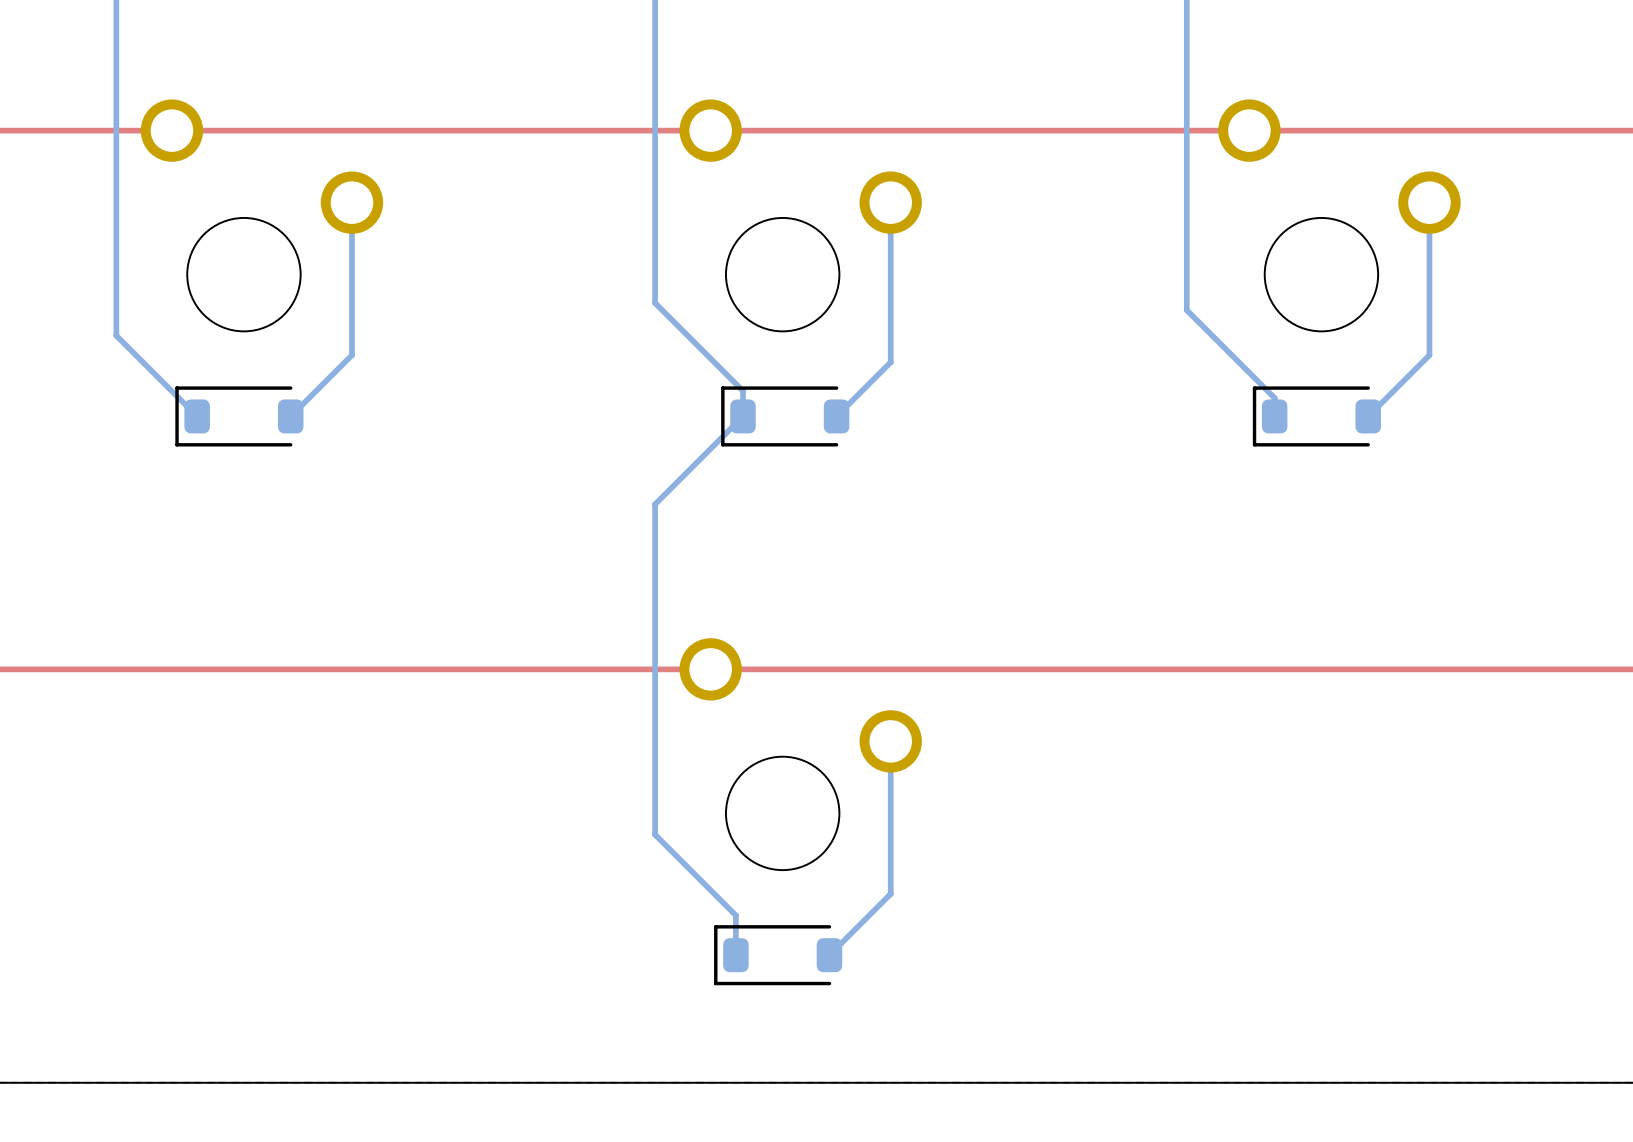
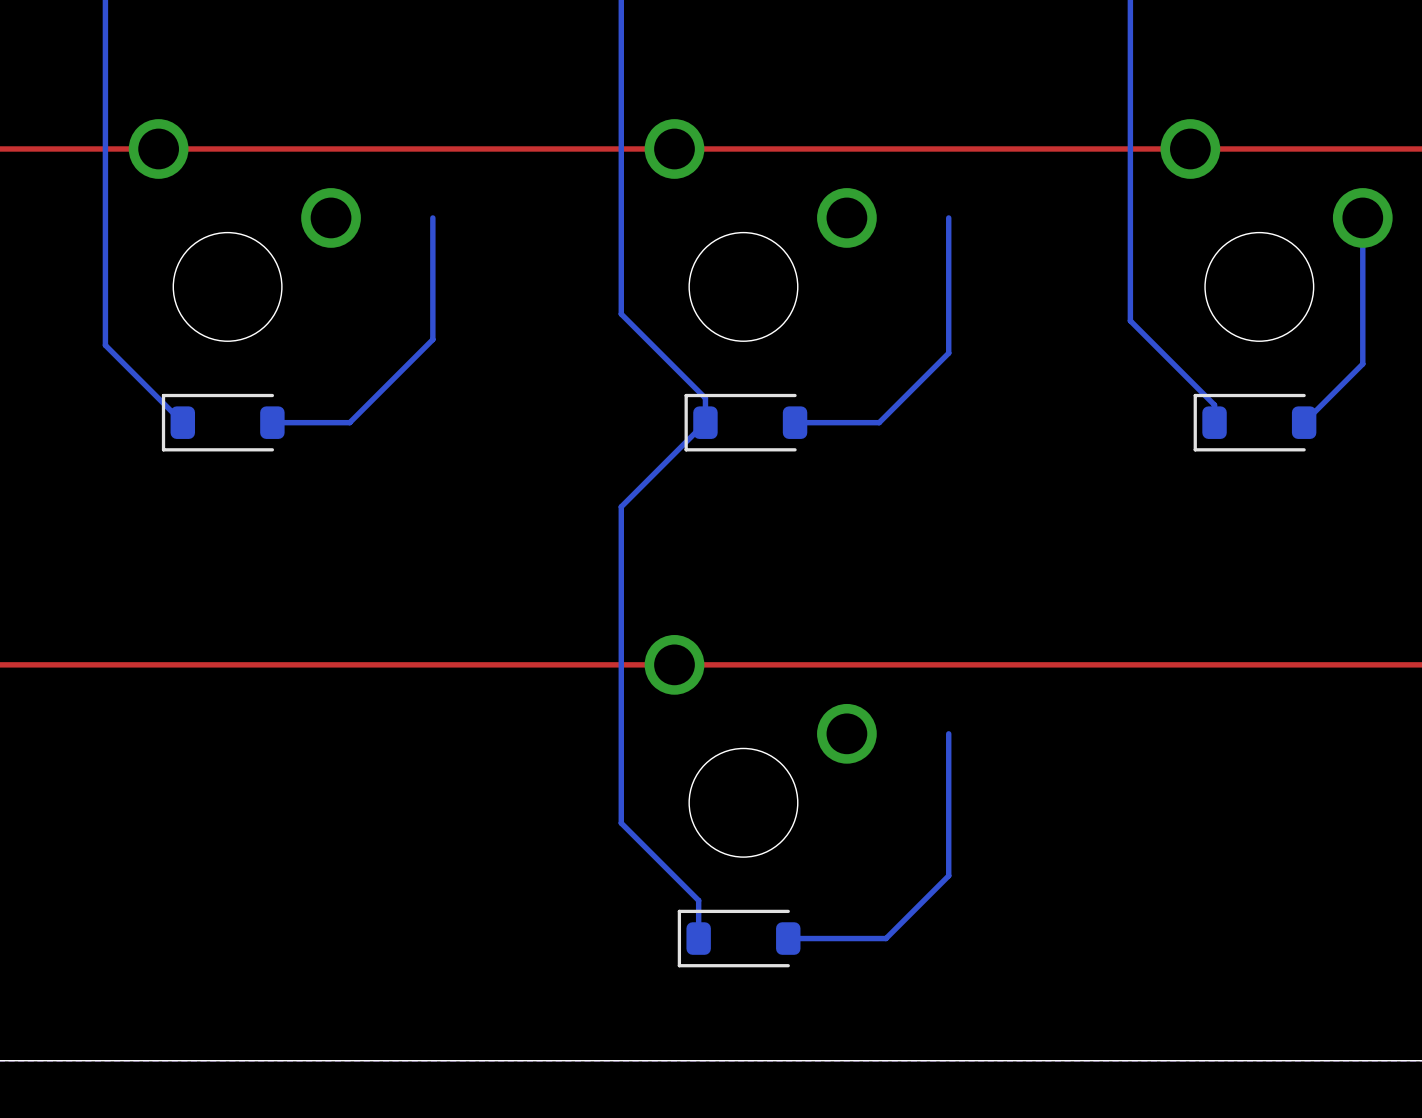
bottom track: (351, 202) (351, 355) (290, 416) -> (432, 217) (432, 339) (349, 422) (272, 422)
bottom track: (890, 202) (890, 362) (836, 416) -> (948, 217) (948, 353) (879, 422) (795, 422)
bottom track: (890, 741) (890, 893) (829, 955) -> (948, 733) (948, 875) (886, 938) (788, 938)

